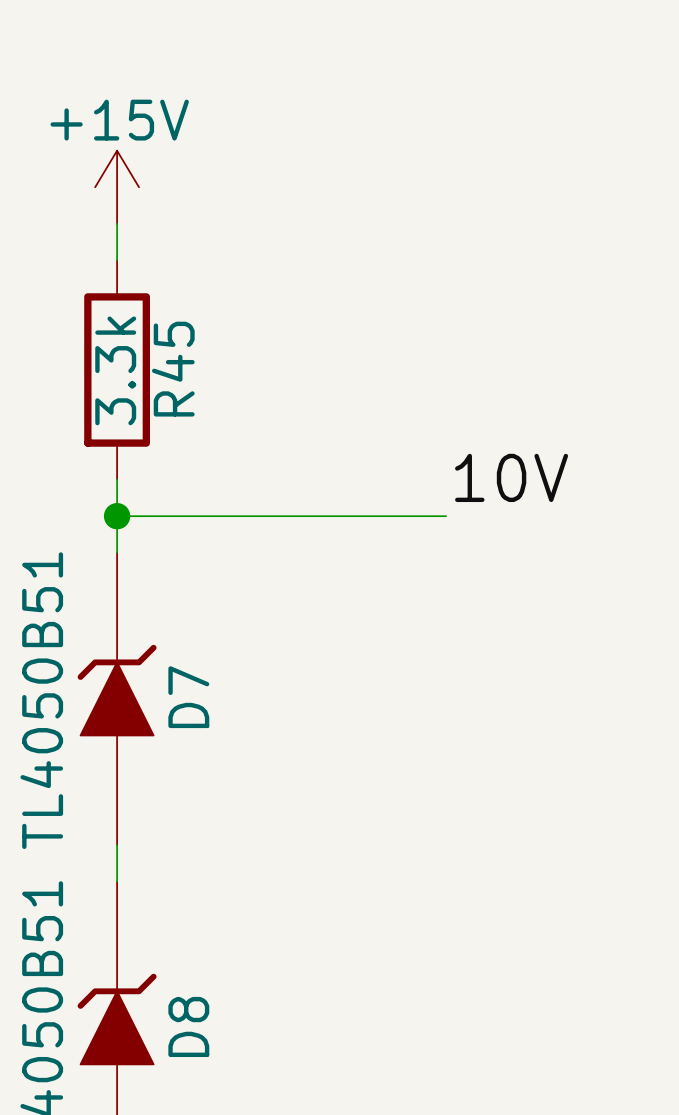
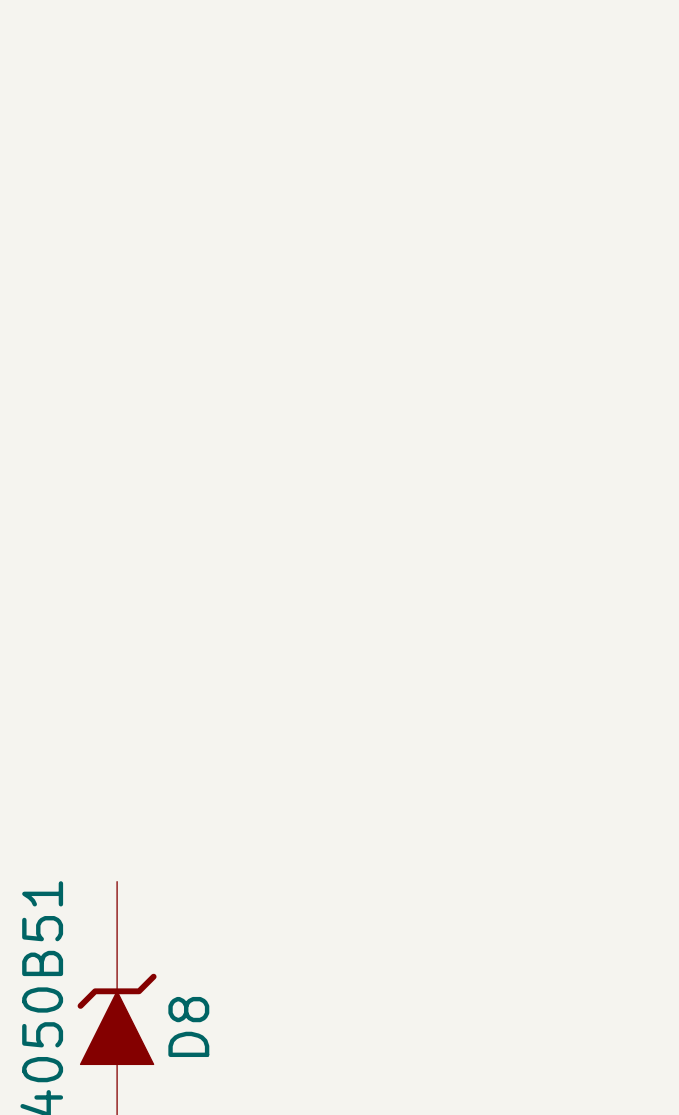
power symbol: +15V (117, 187) -> none
wire: (117, 223) (117, 260) -> none
R45: 3.3k (117, 369) -> none
label: 10V (511, 477) -> none
wire: (117, 479) (117, 552) -> none
wire: (117, 516) (446, 516) -> none
junction: (117, 516) -> none
D7: TL4050B51 (117, 698) -> none
wire: (117, 845) (117, 881) -> none

